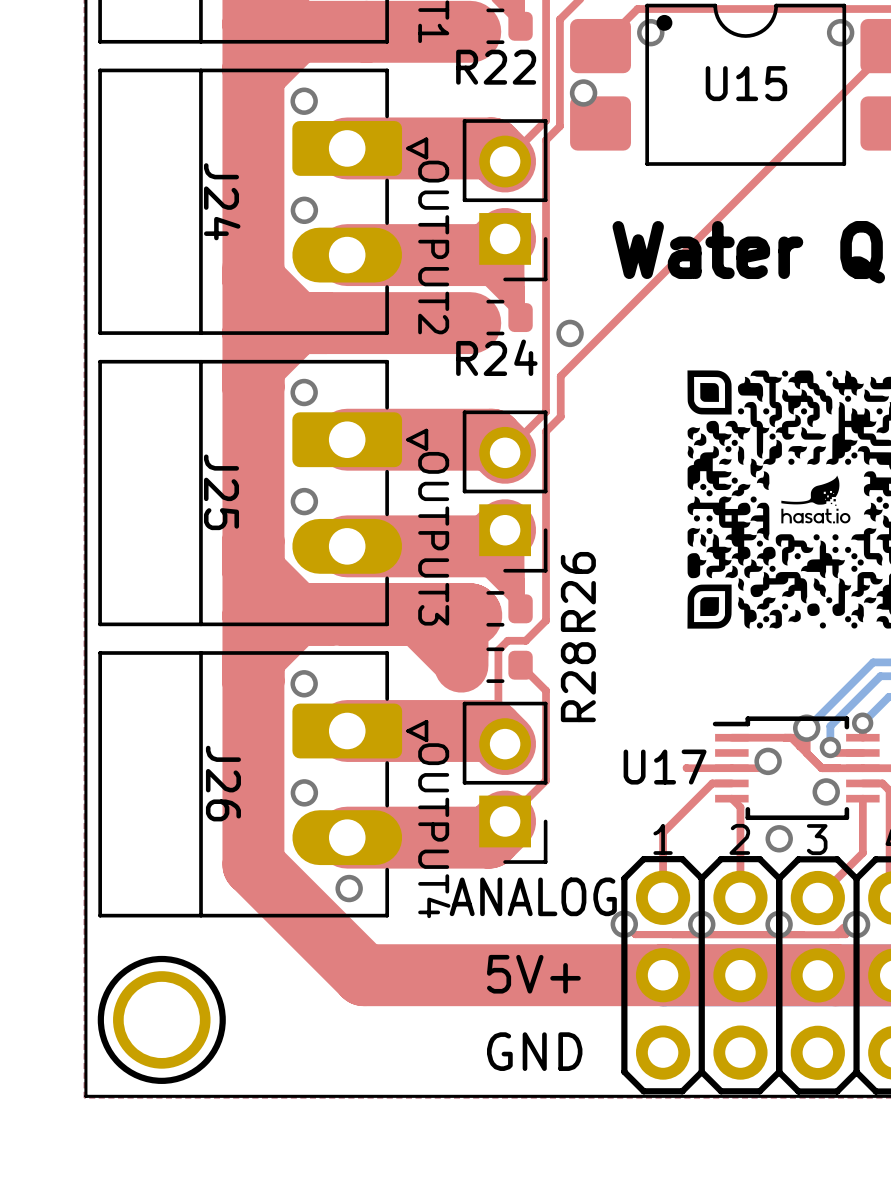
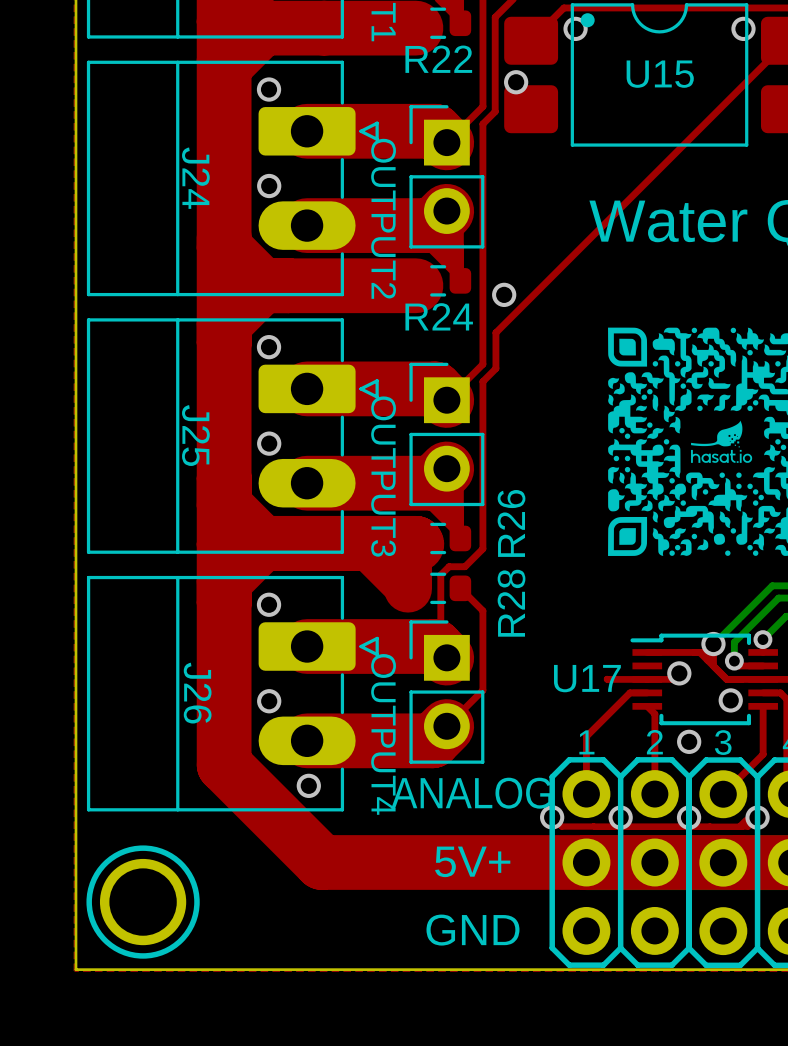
part rotation: 0° (505, 200) -> 180° (446, 176)
part rotation: 0° (505, 491) -> 180° (446, 434)
part rotation: 0° (505, 782) -> 180° (446, 692)

